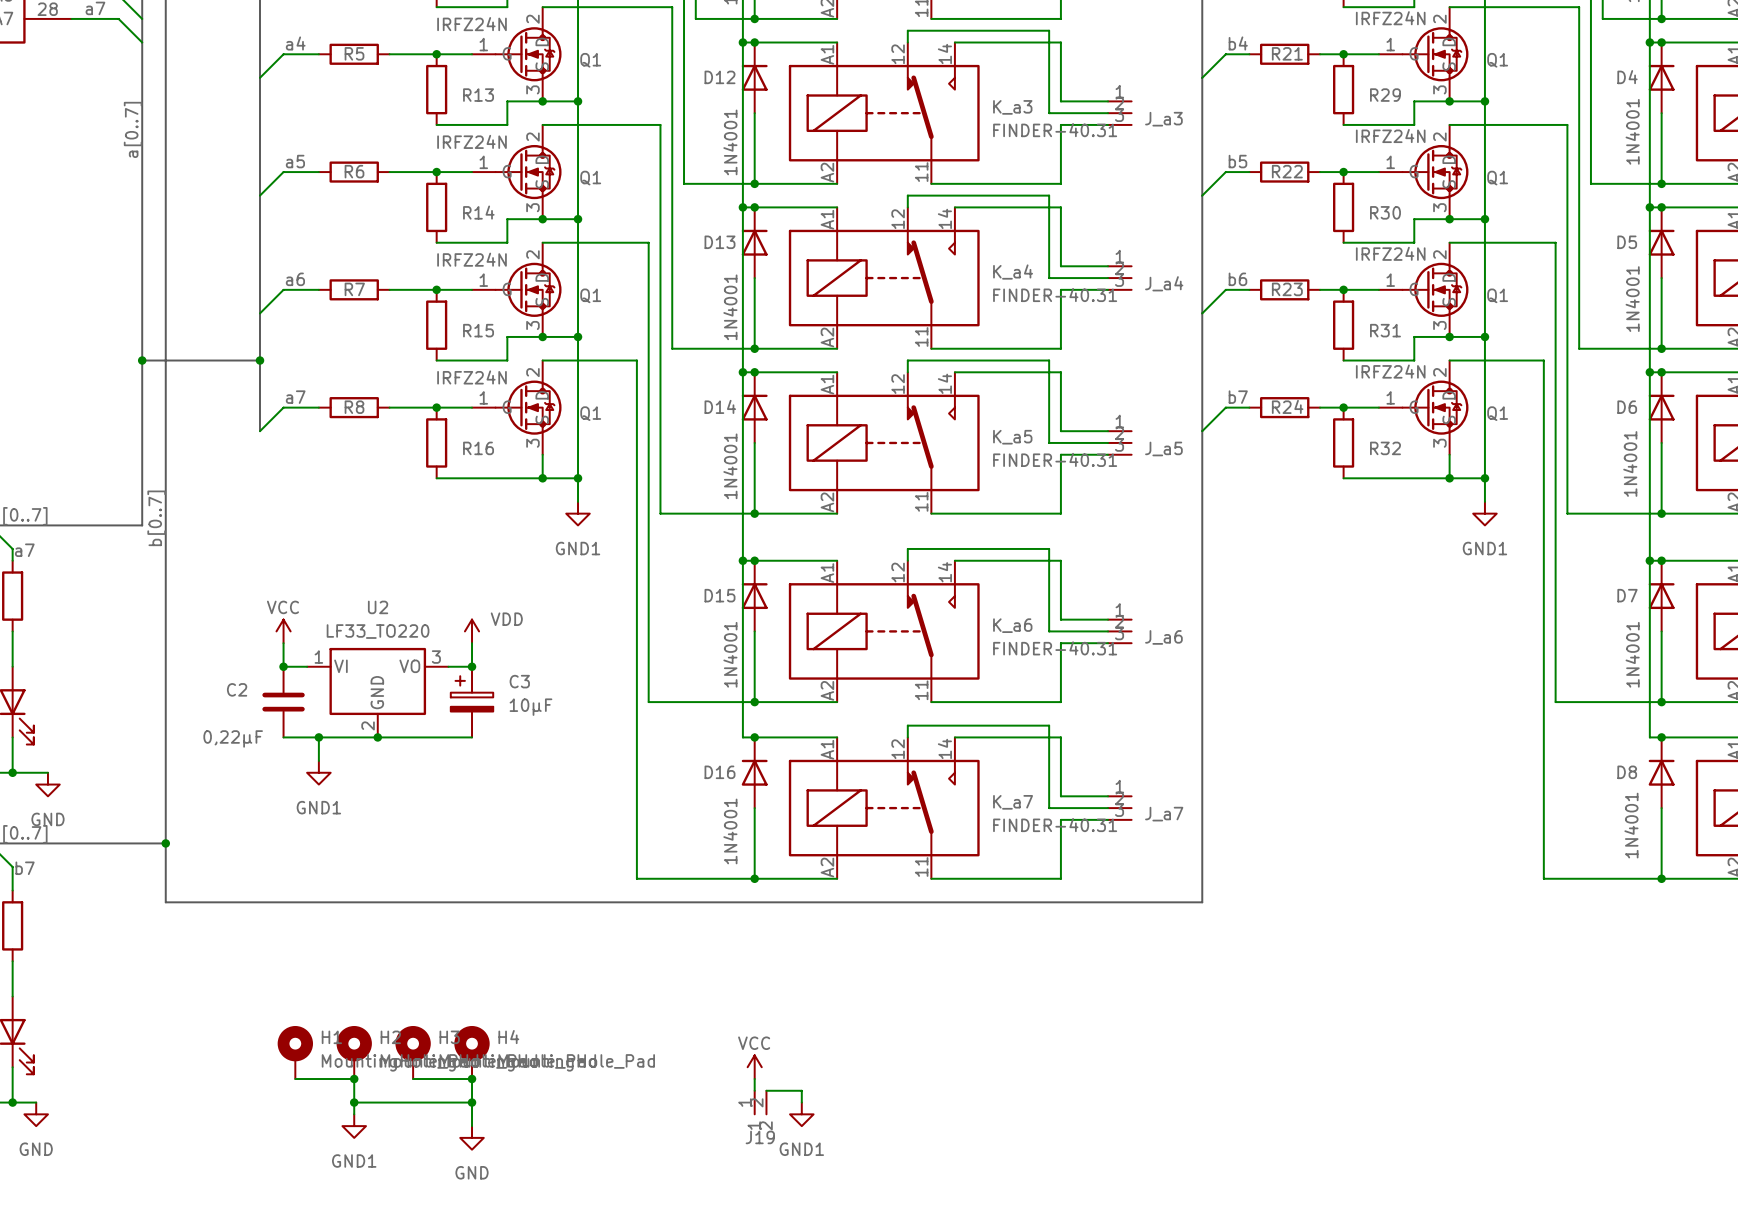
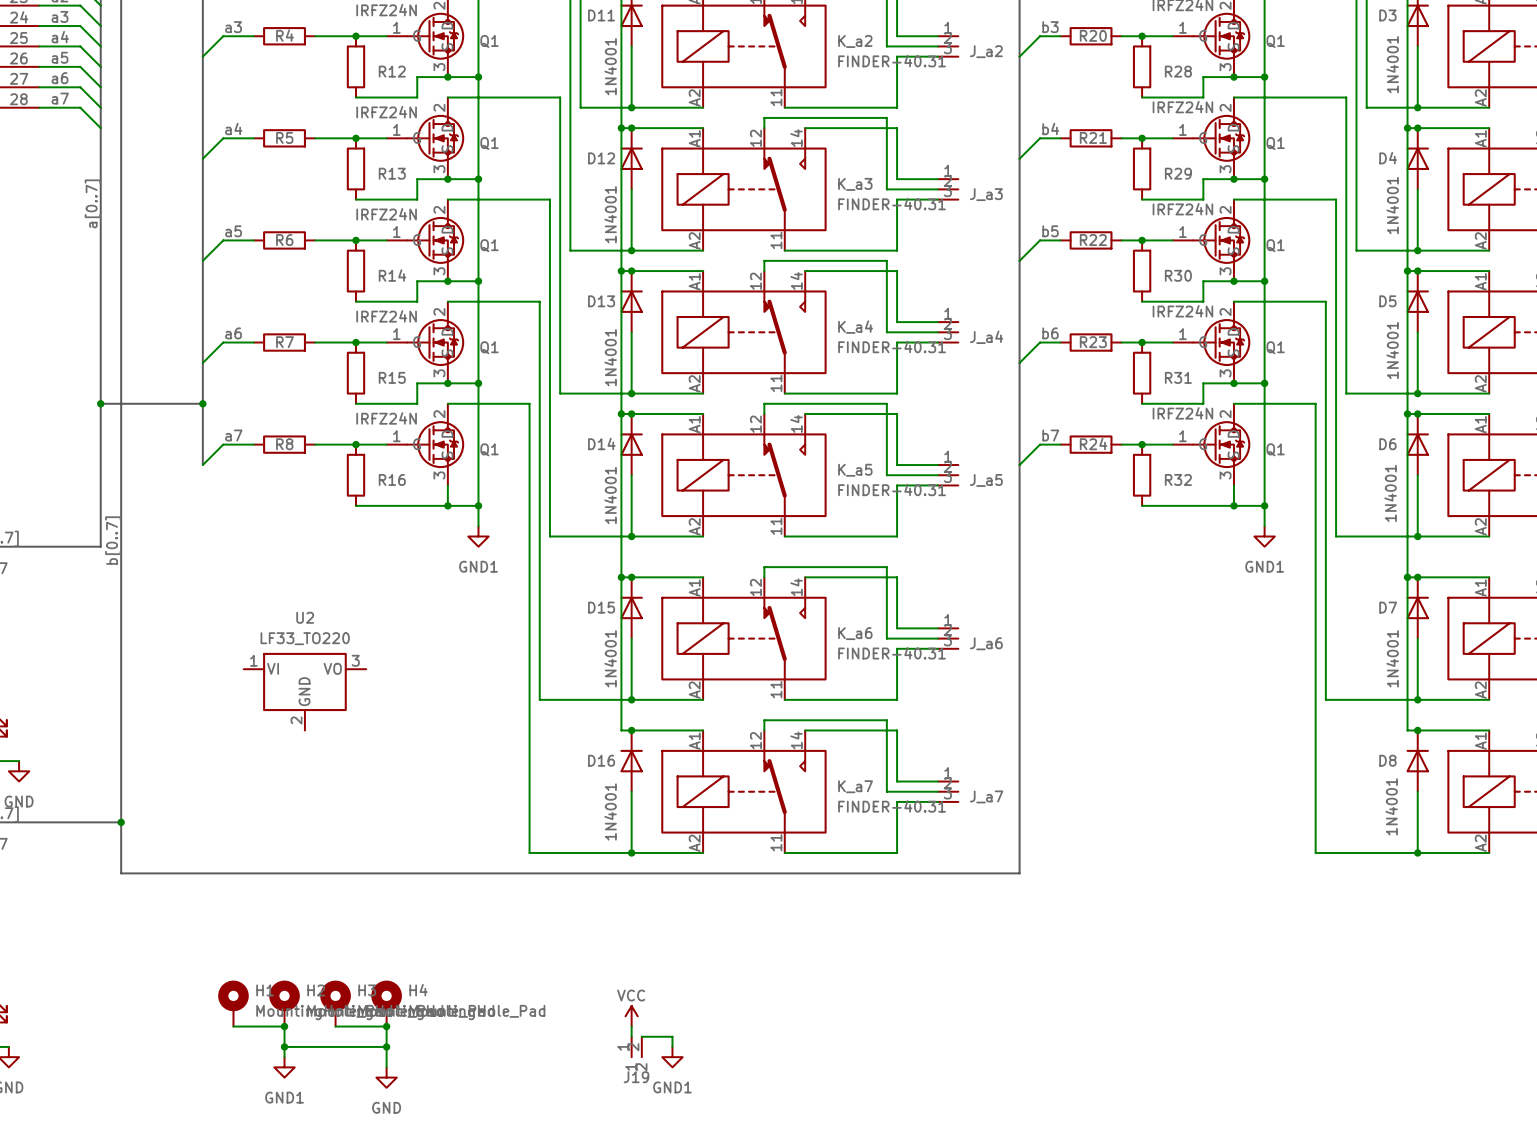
power symbol: VCC (283, 631) -> none
power symbol: VDD (472, 631) -> none
wire: (283, 643) (283, 666) (307, 666) -> none
wire: (472, 643) (472, 666) (448, 666) -> none
junction: (283, 666) -> none
junction: (472, 666) -> none
C2: 0,22µF (283, 702) -> none
C3: 10µF (472, 702) -> none
wire: (283, 737) (472, 737) -> none
wire: (318, 737) (318, 760) -> none
junction: (318, 737) -> none
junction: (377, 737) -> none
power symbol: GND1 (318, 772) -> none

